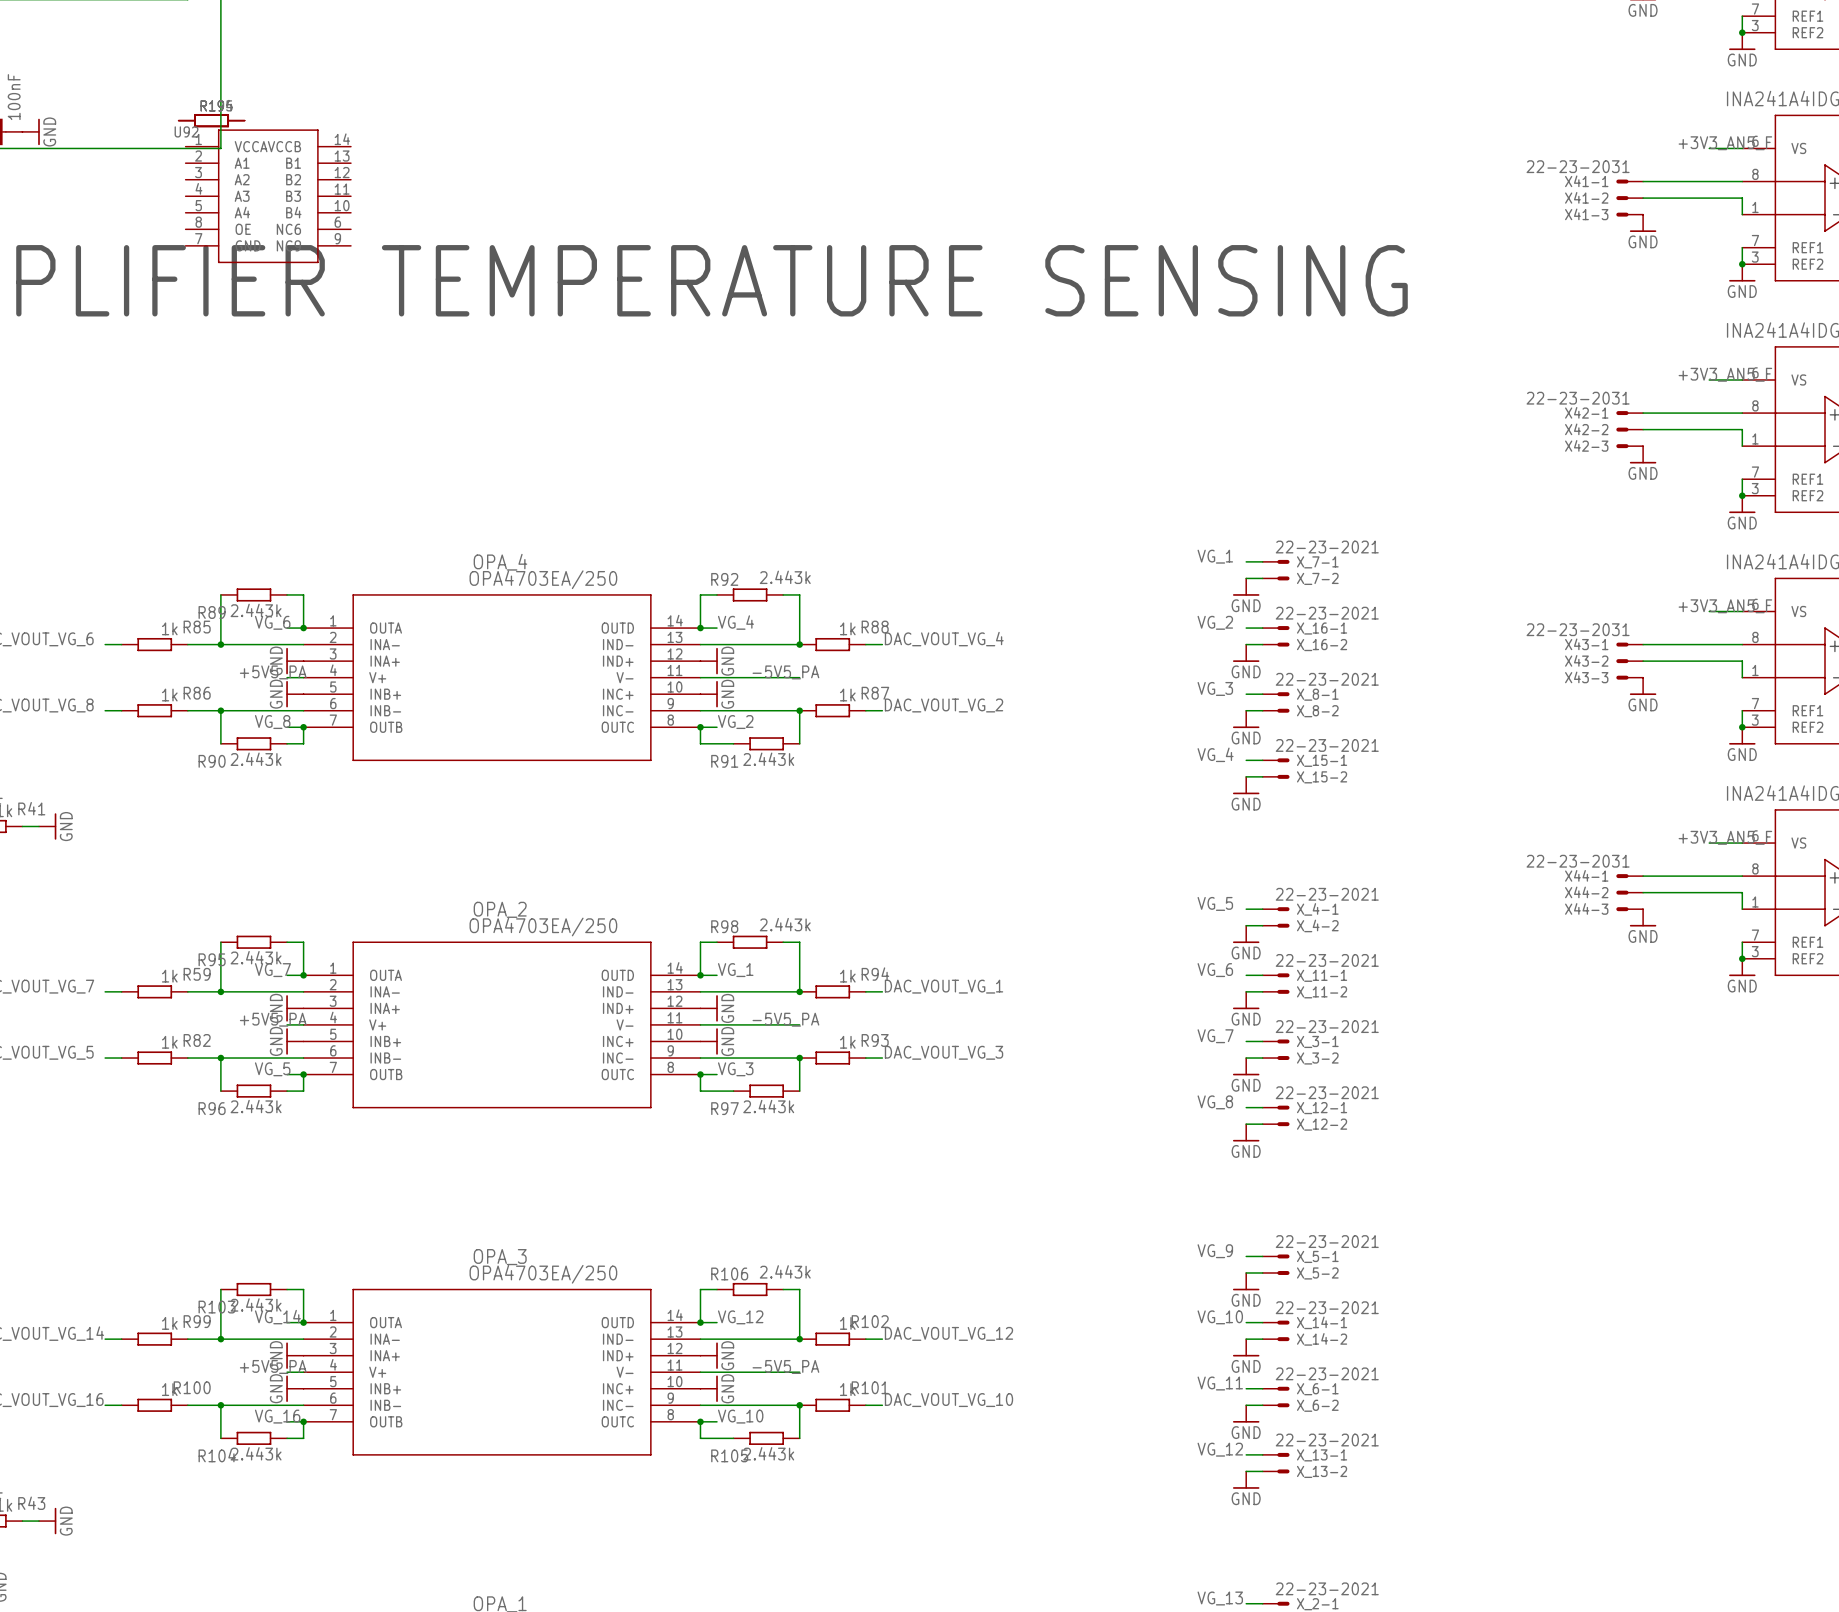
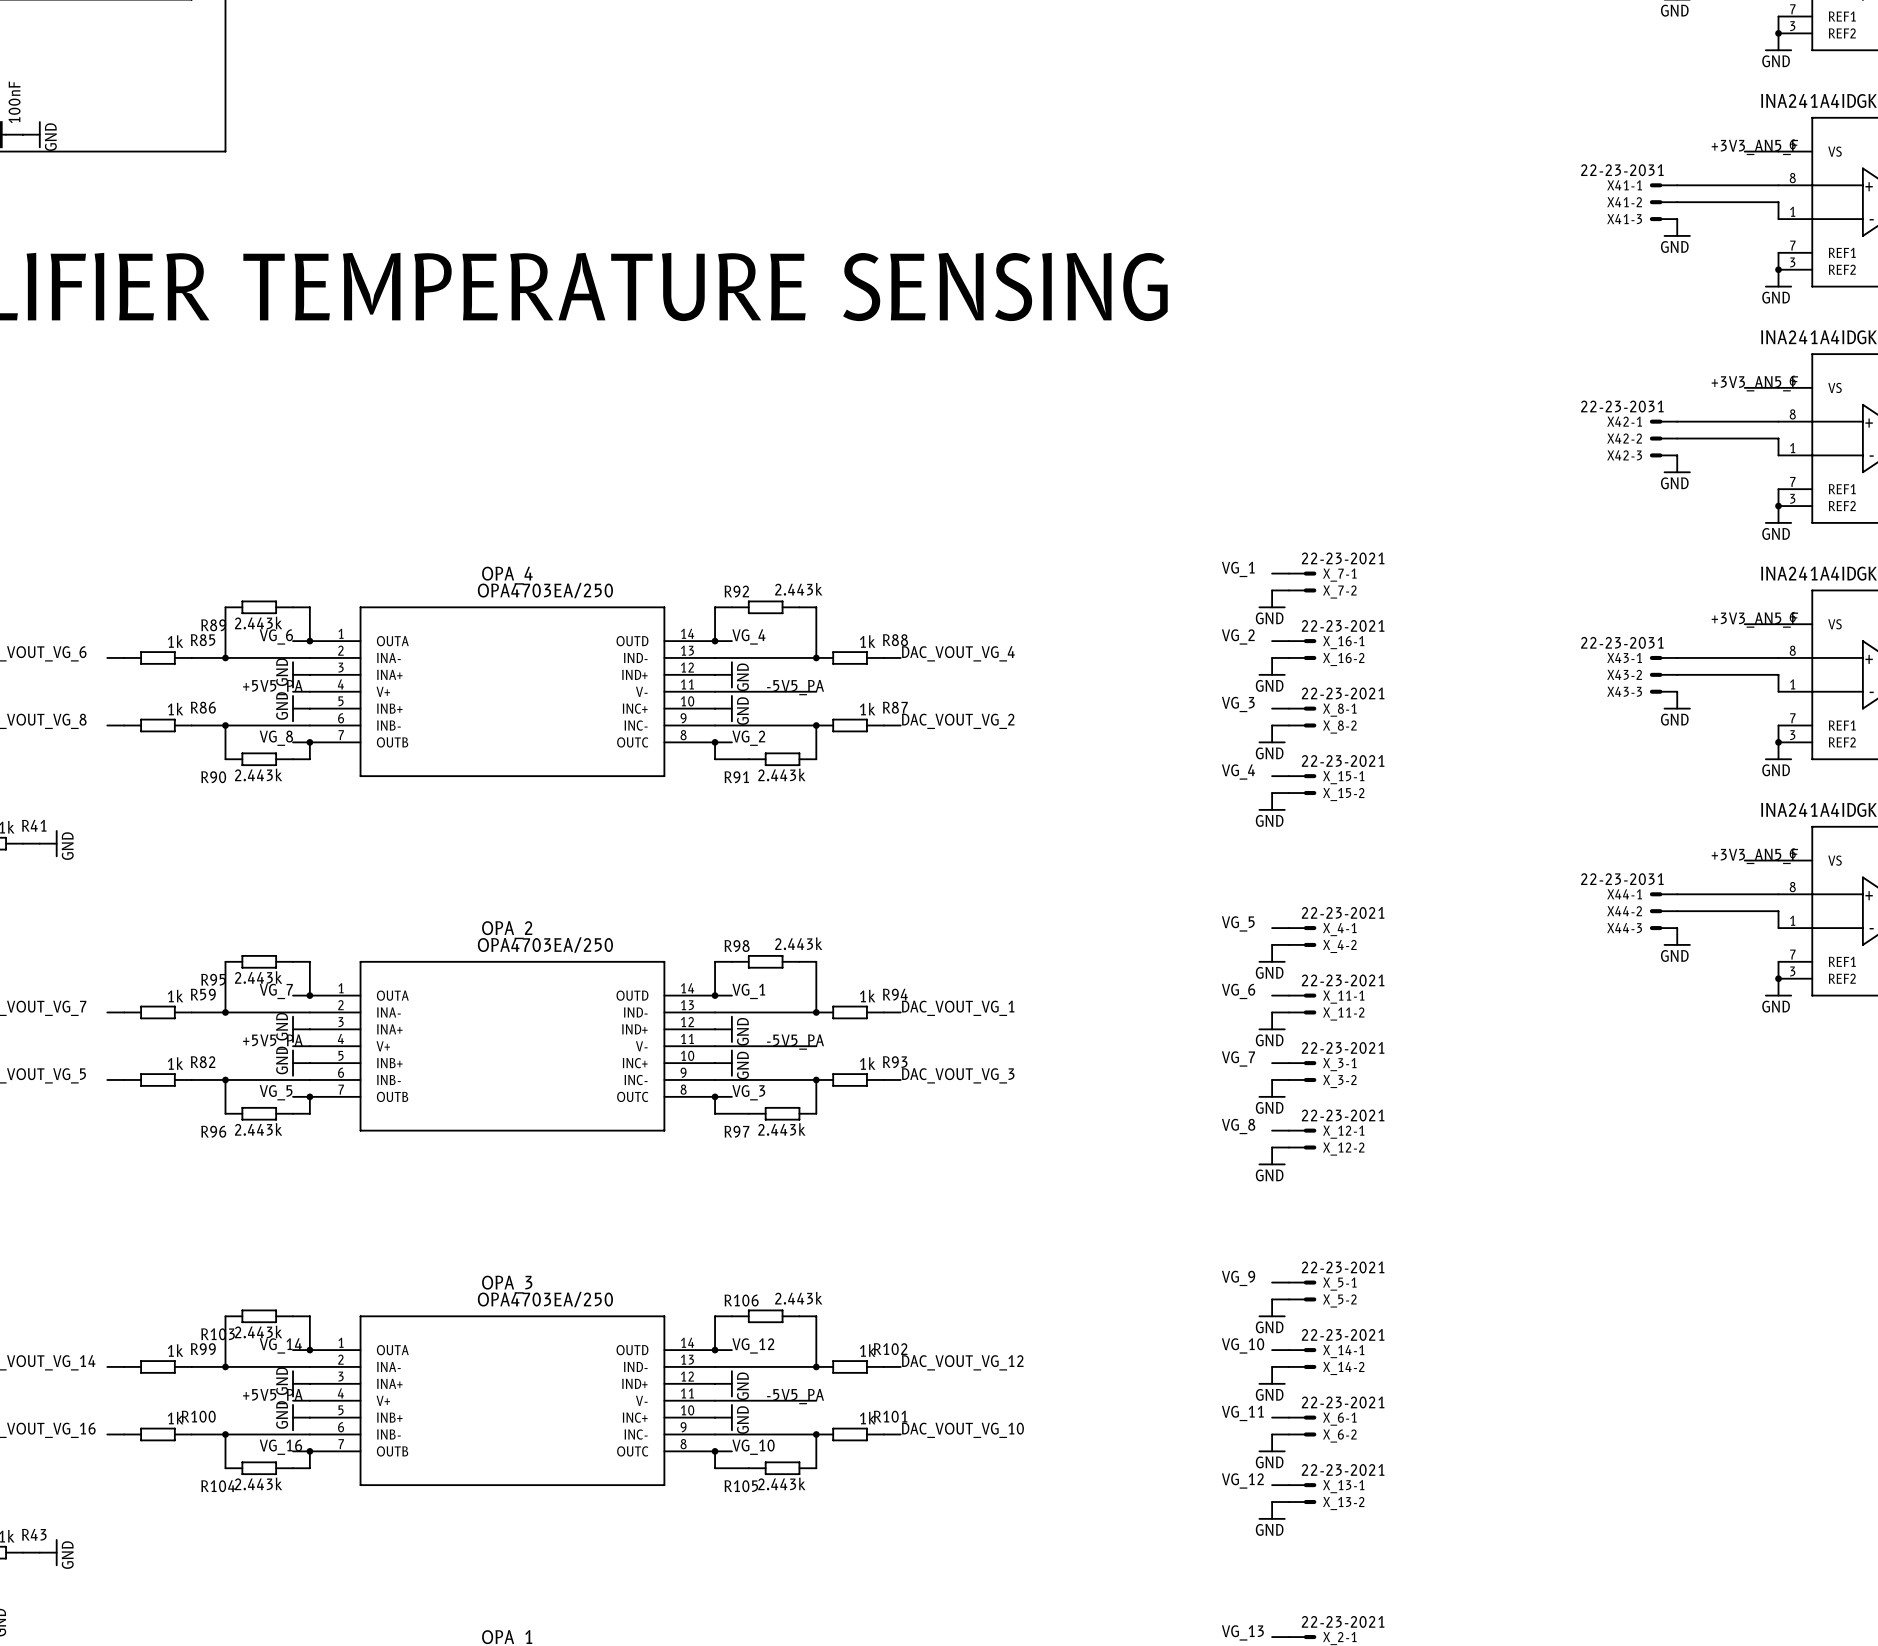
part: (211, 120) -> none
part: (211, 120) -> none
U92: (268, 196) -> none

